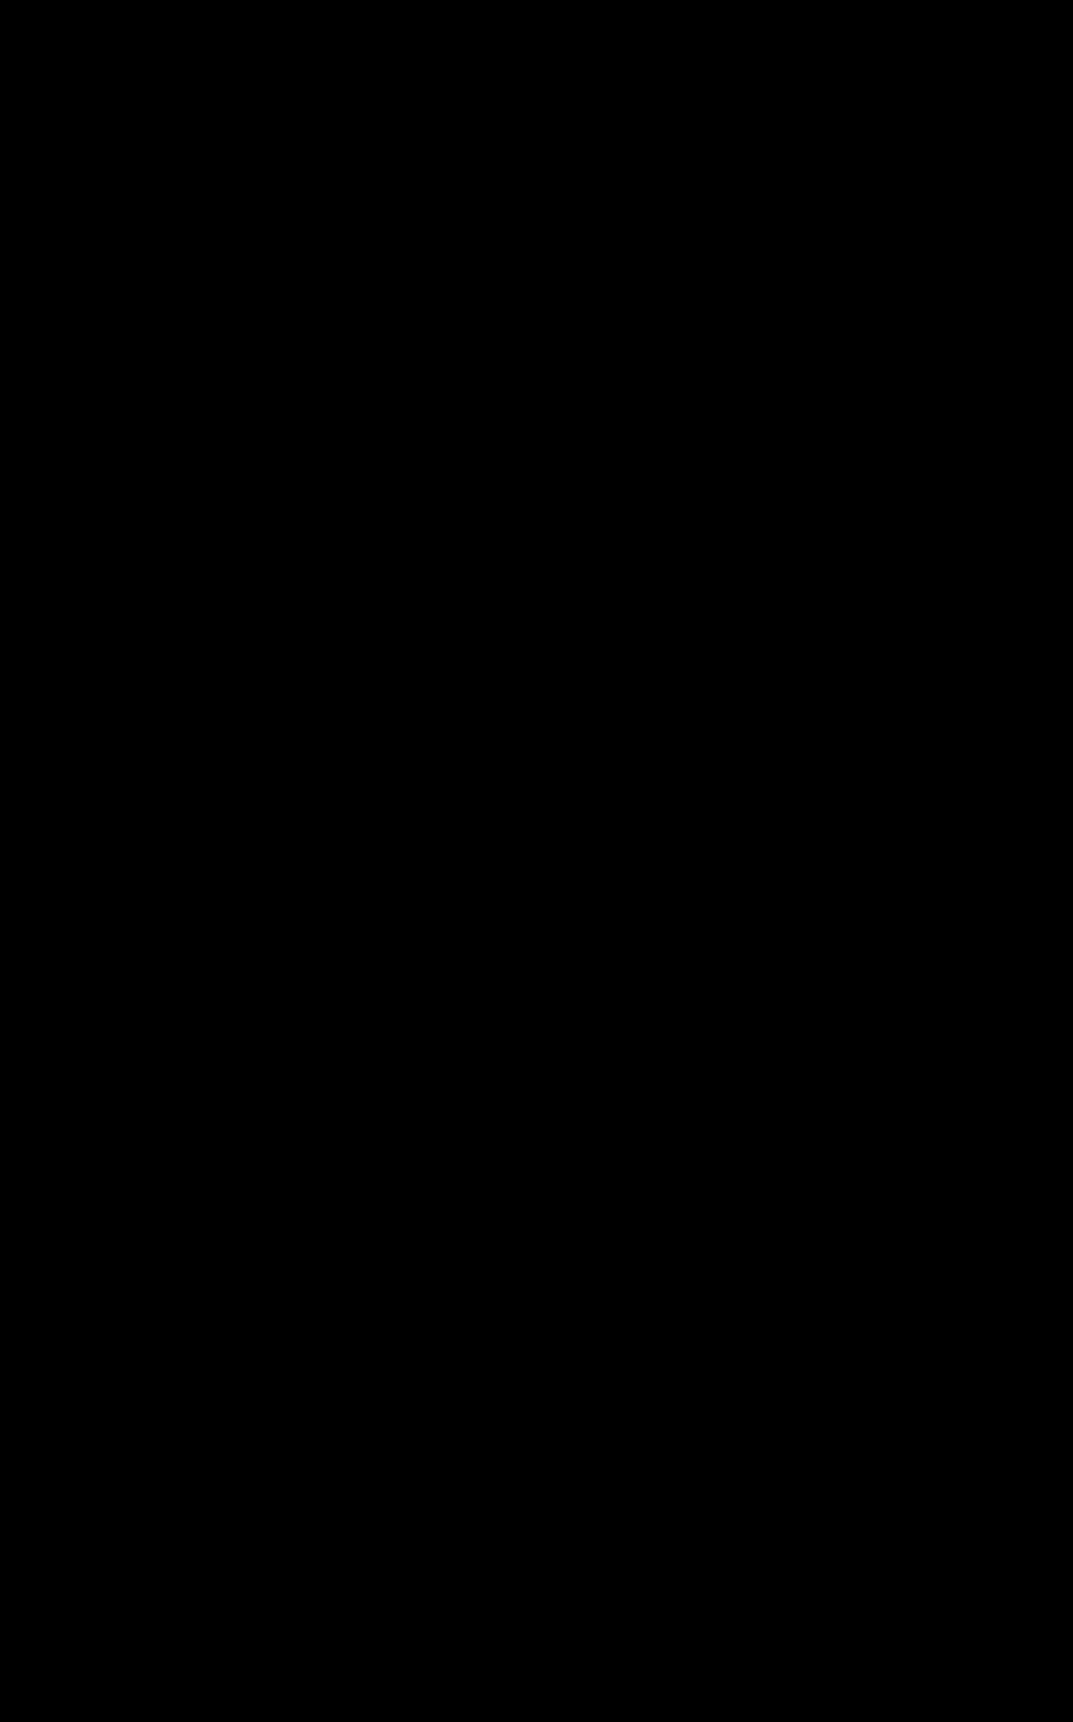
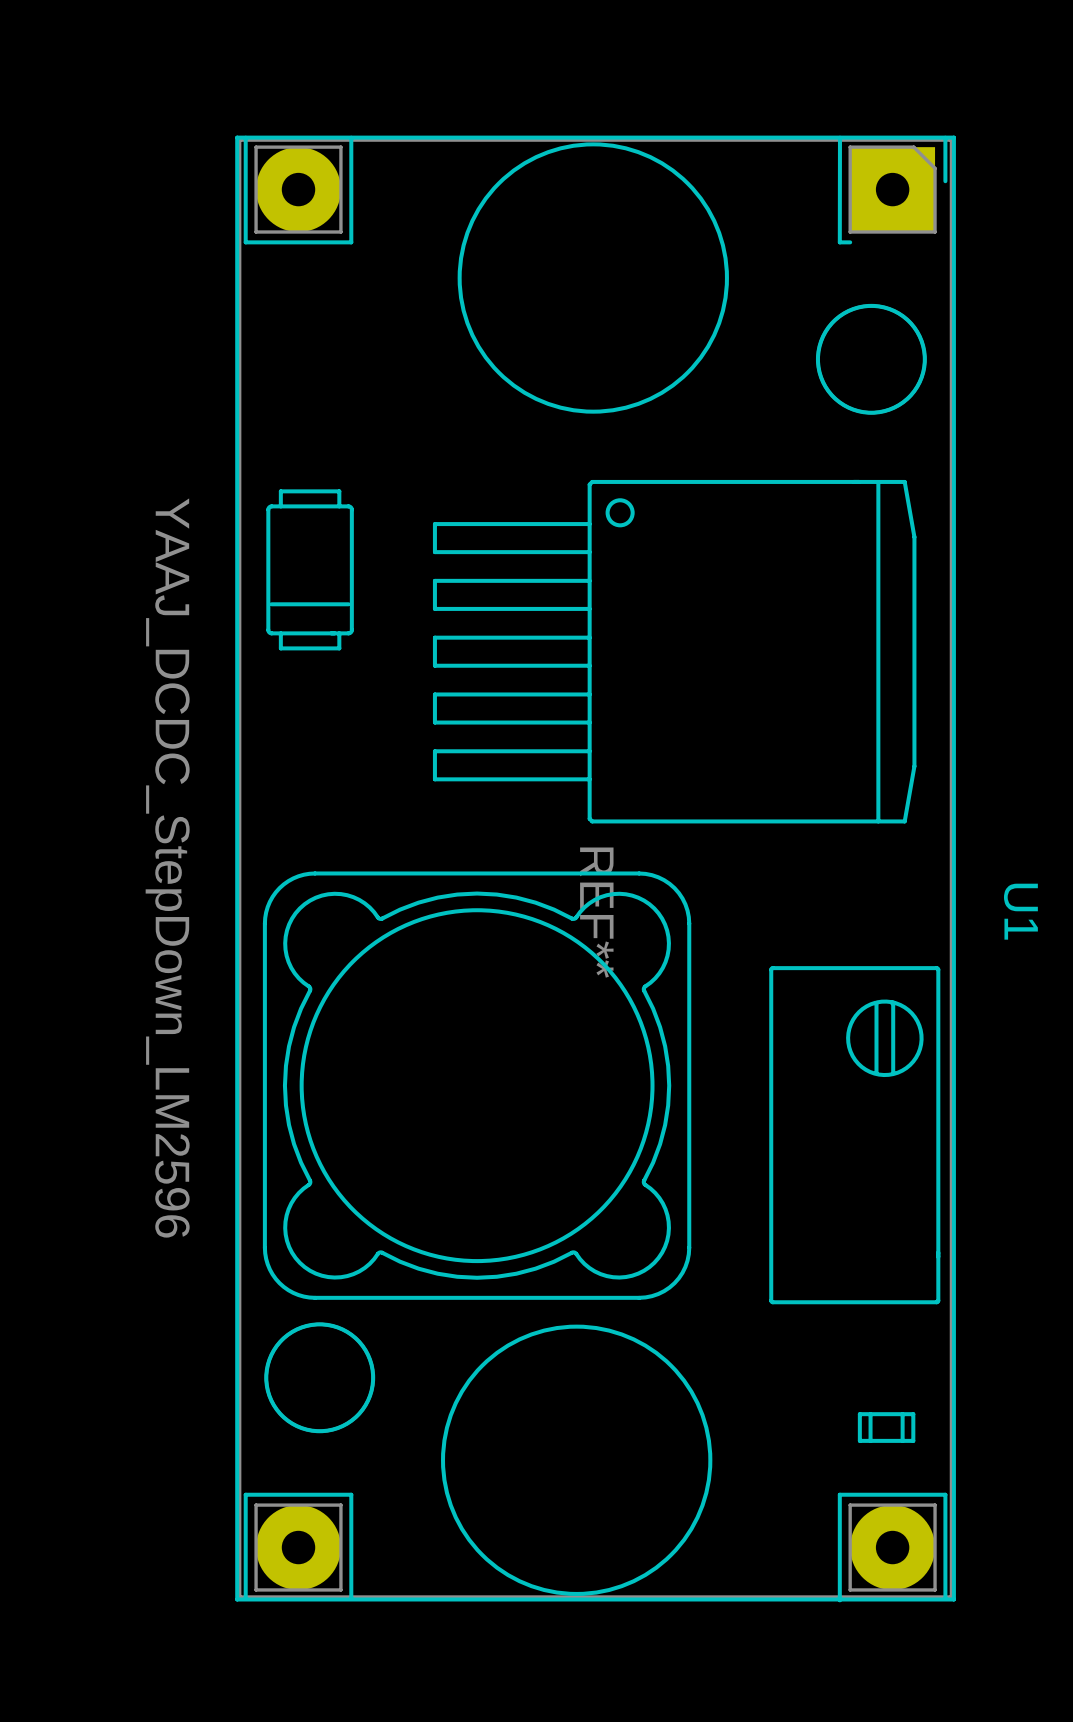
U1: none -> YAAJ_DCDC_StepDown_LM2596 (595, 868)

